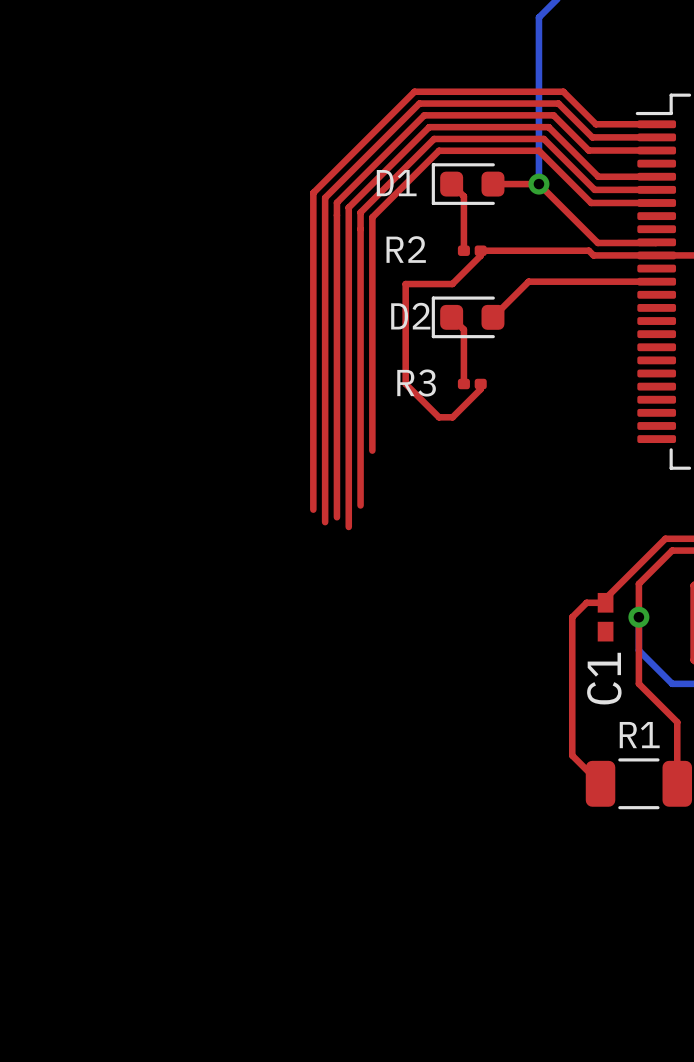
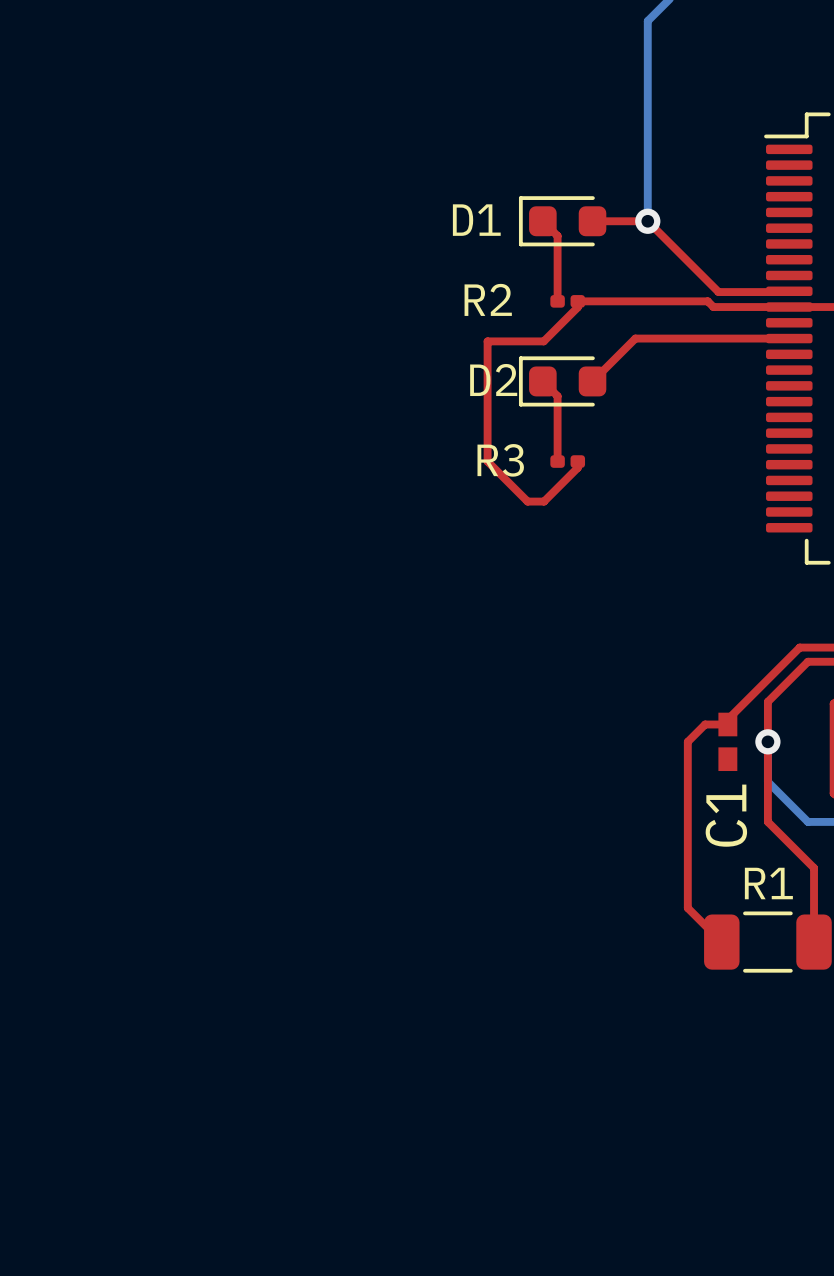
top track: (656, 124) (595, 124) (563, 91) (414, 91) (313, 192) (313, 509) -> none
top track: (656, 137) (592, 137) (558, 103) (419, 103) (325, 197) (325, 522) -> none
top track: (656, 150) (588, 150) (553, 115) (424, 115) (336, 202) (336, 517) -> none
top track: (656, 176) (598, 176) (548, 127) (429, 127) (348, 207) (348, 526) -> none
top track: (656, 189) (594, 189) (543, 138) (434, 138) (360, 212) (360, 505) -> none
top track: (656, 202) (591, 202) (538, 150) (438, 150) (372, 217) (372, 450) -> none

